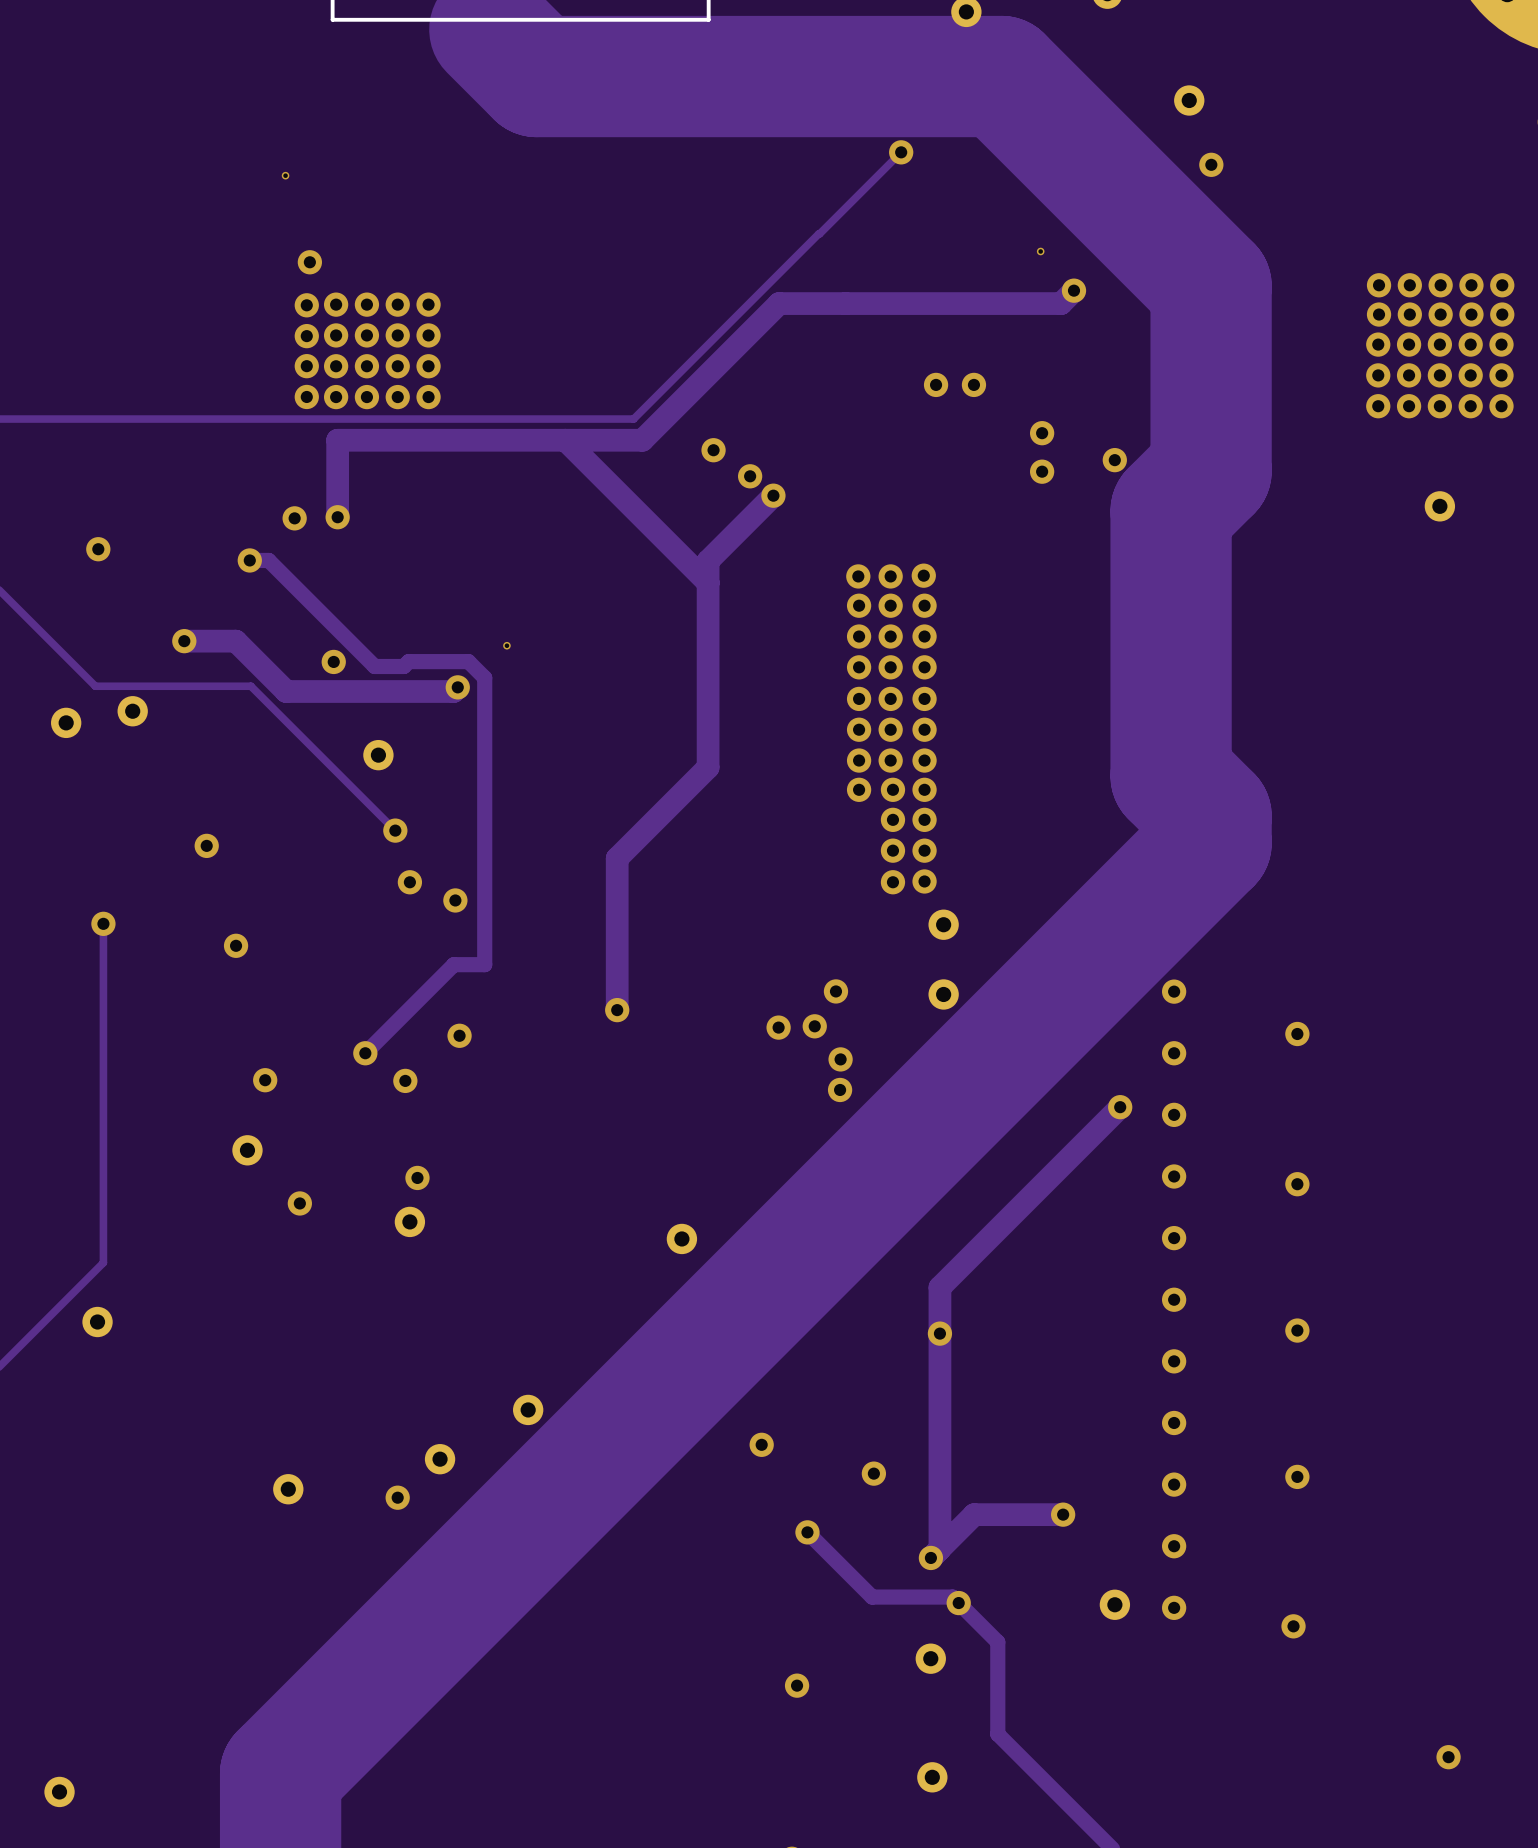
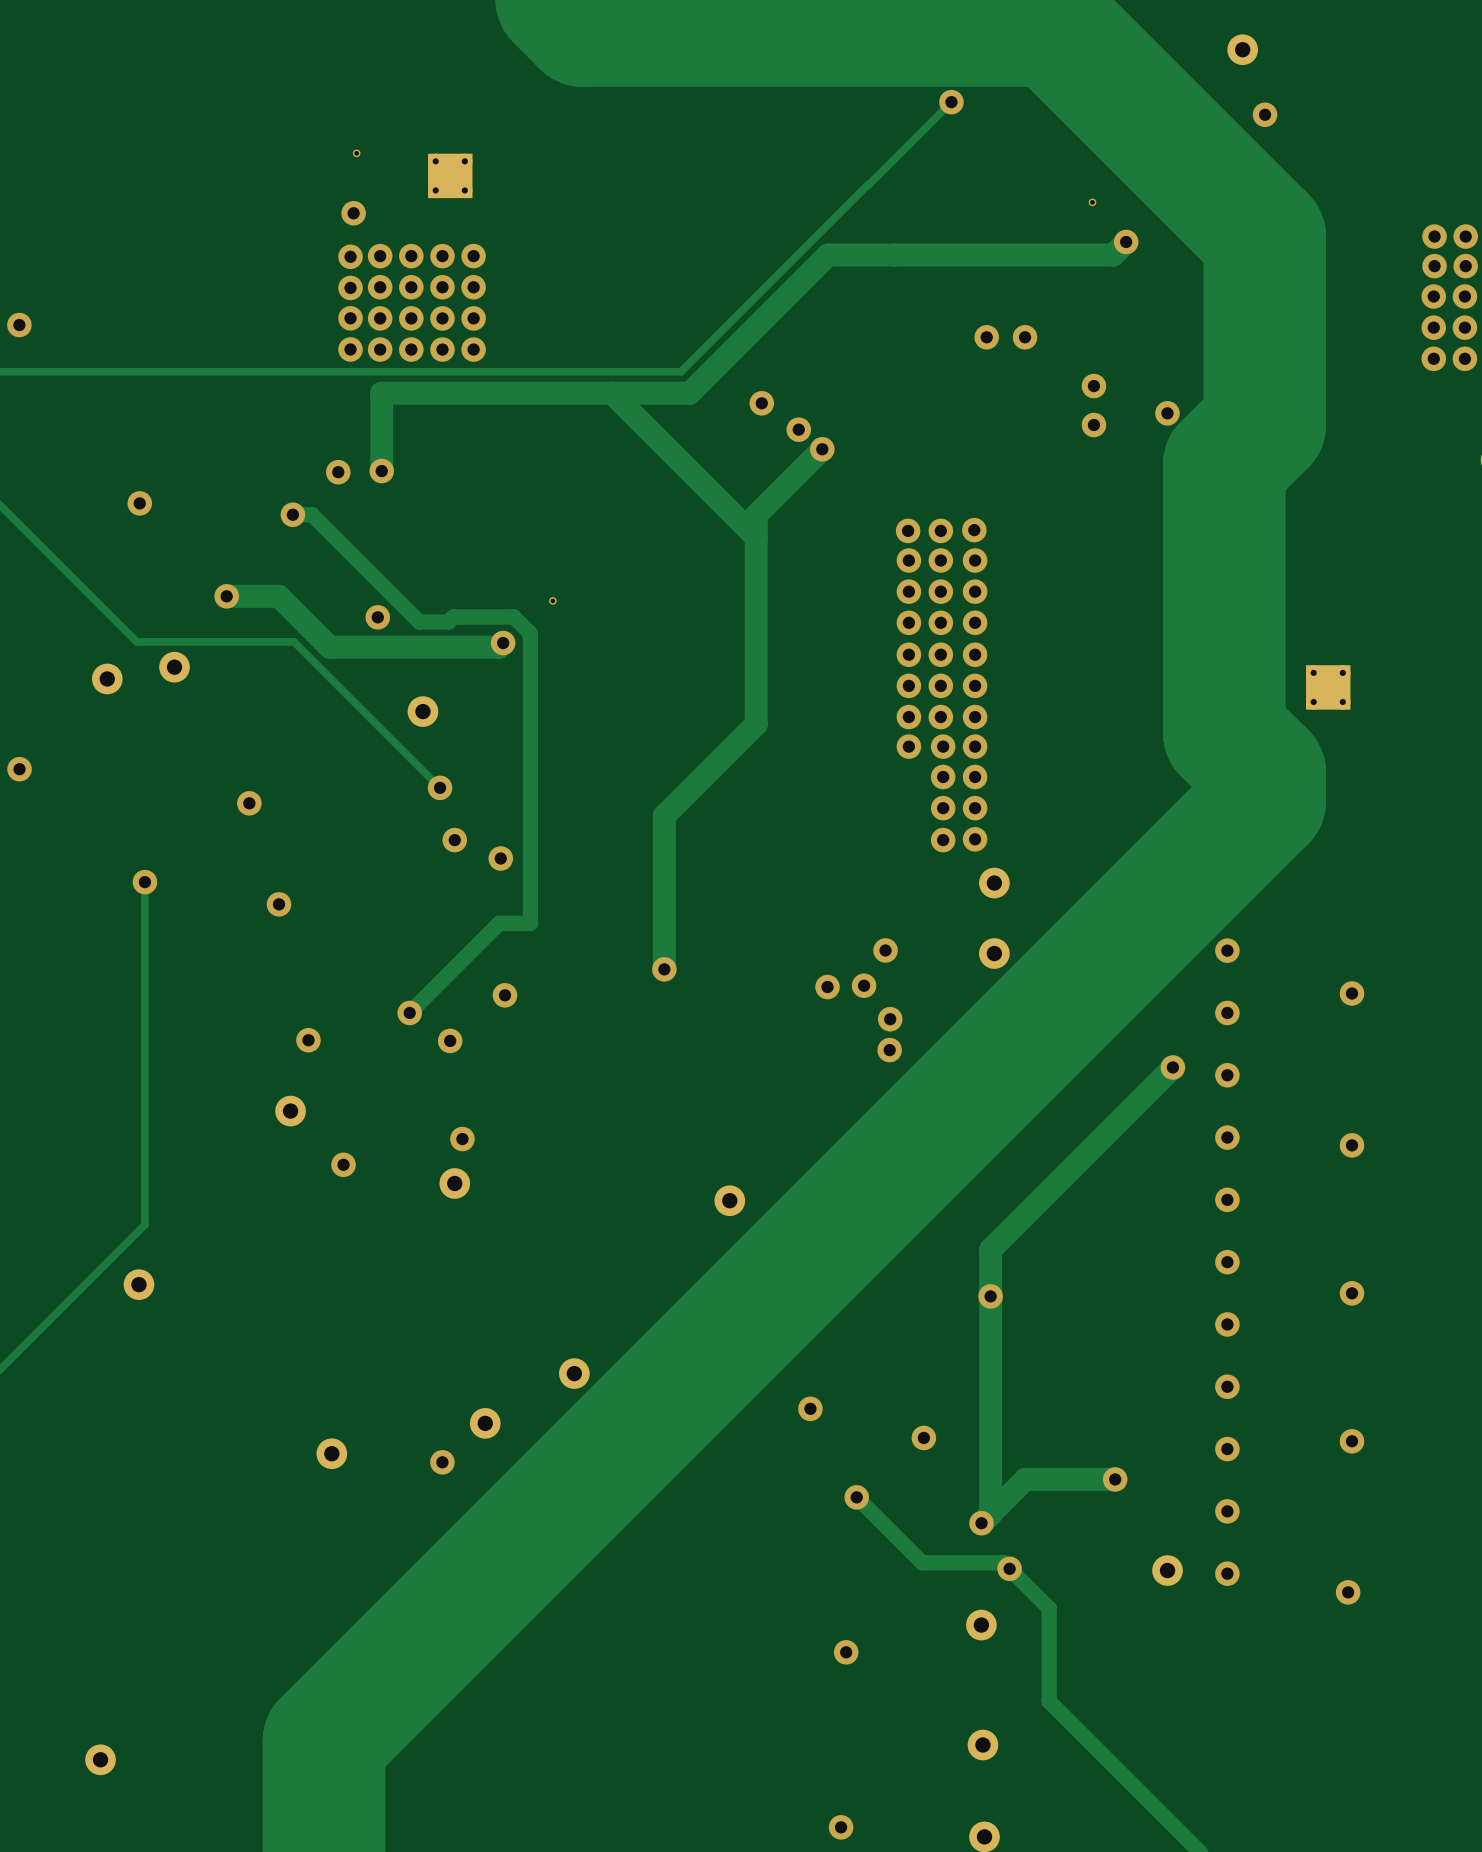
via position: (285, 175) -> (356, 153)
part: none -> (450, 175)
part: none -> (1328, 687)

